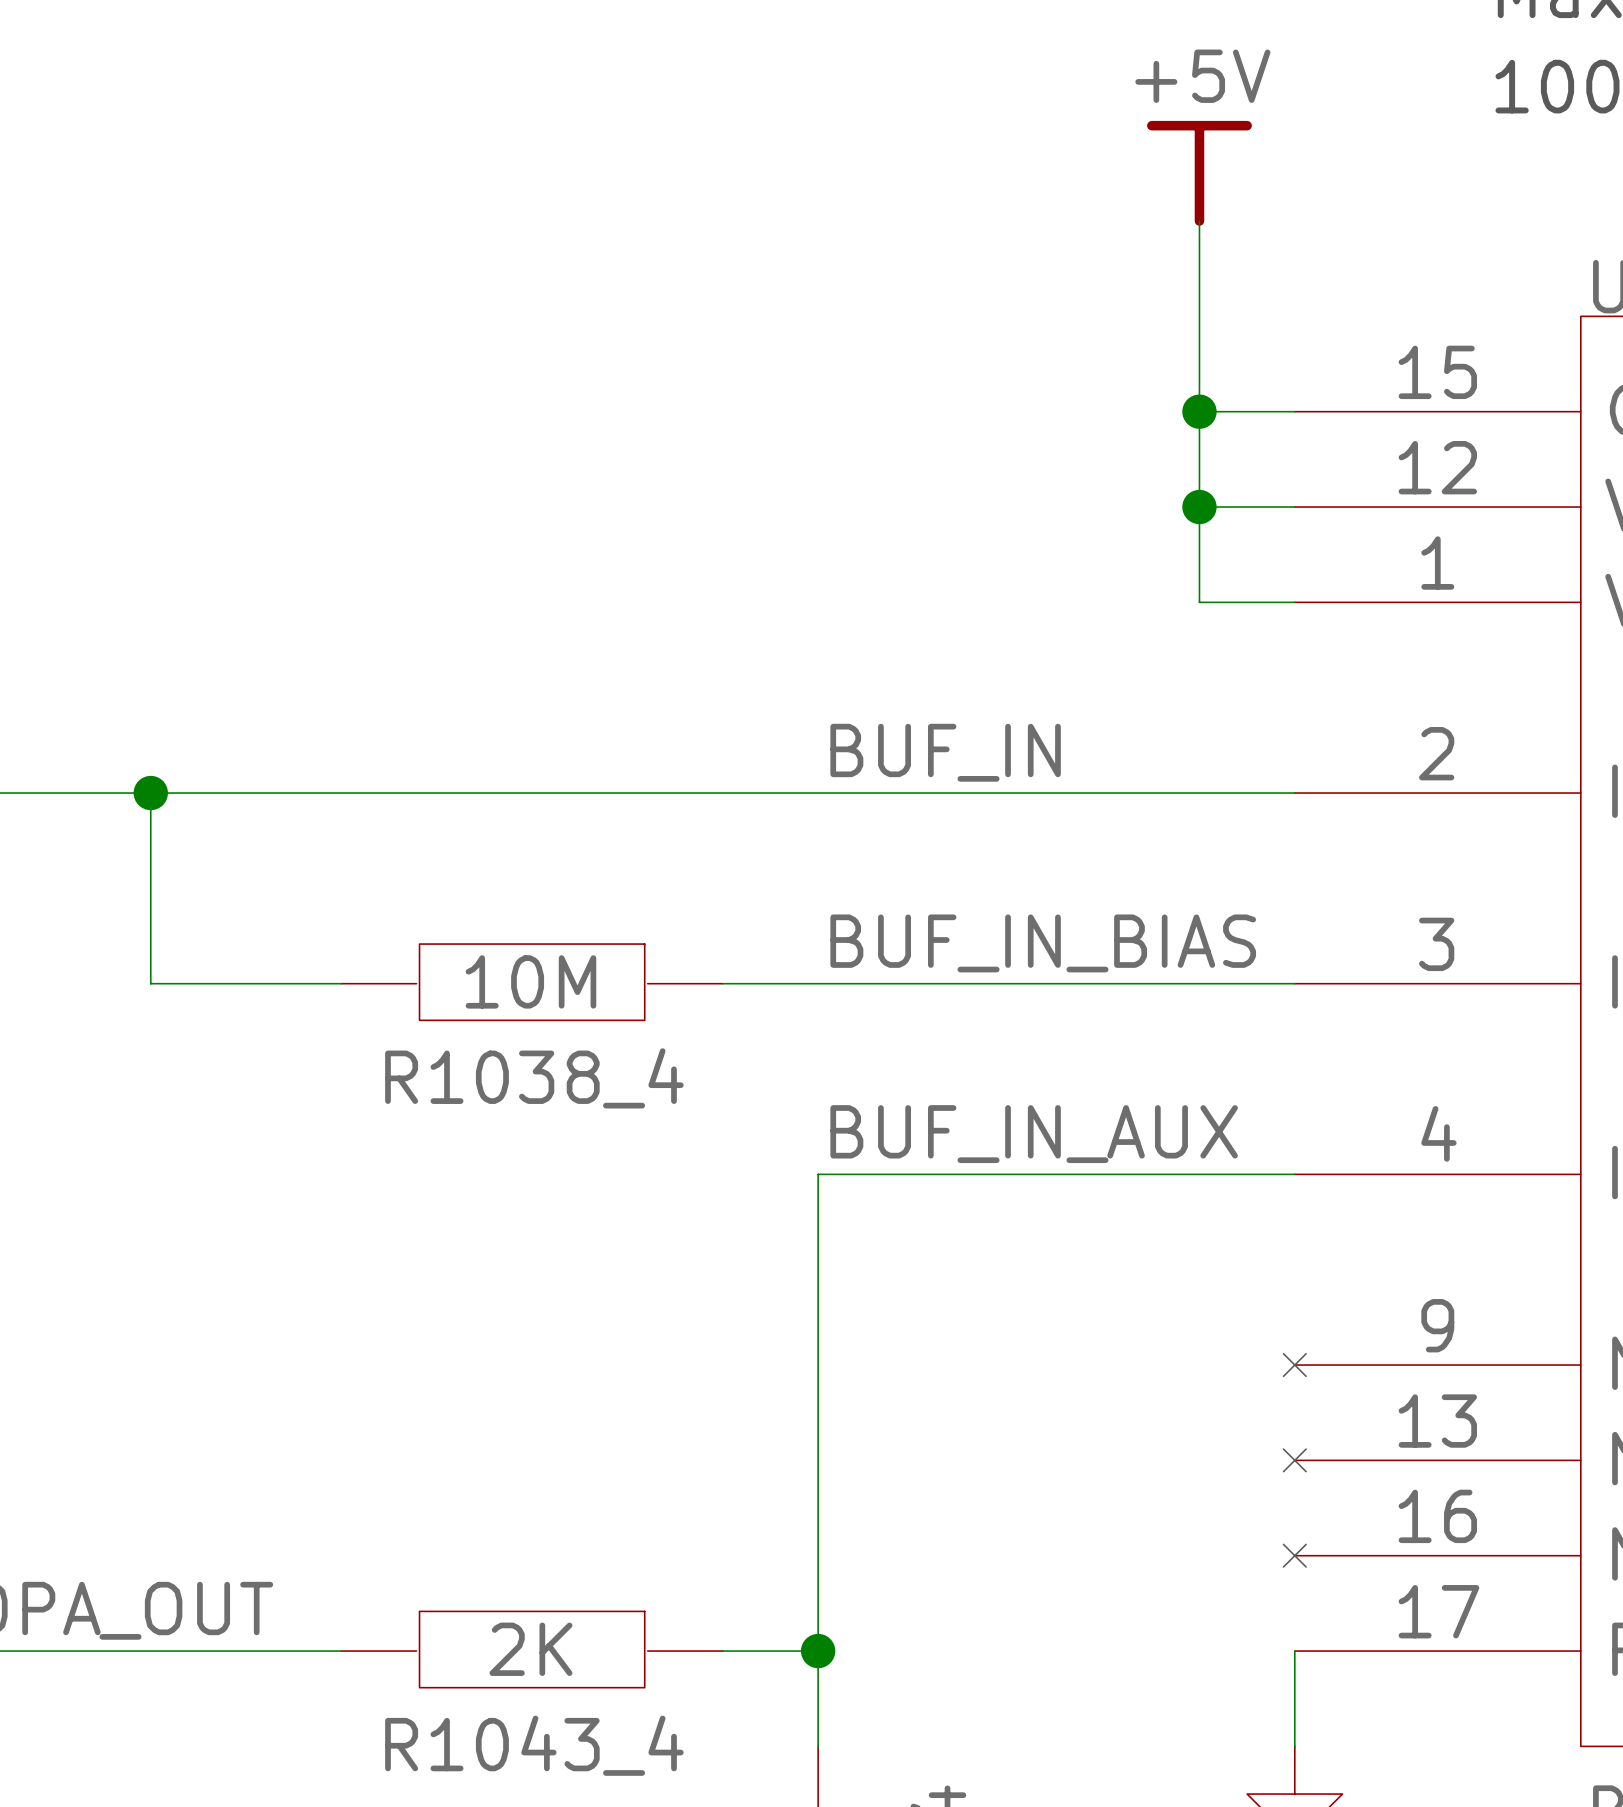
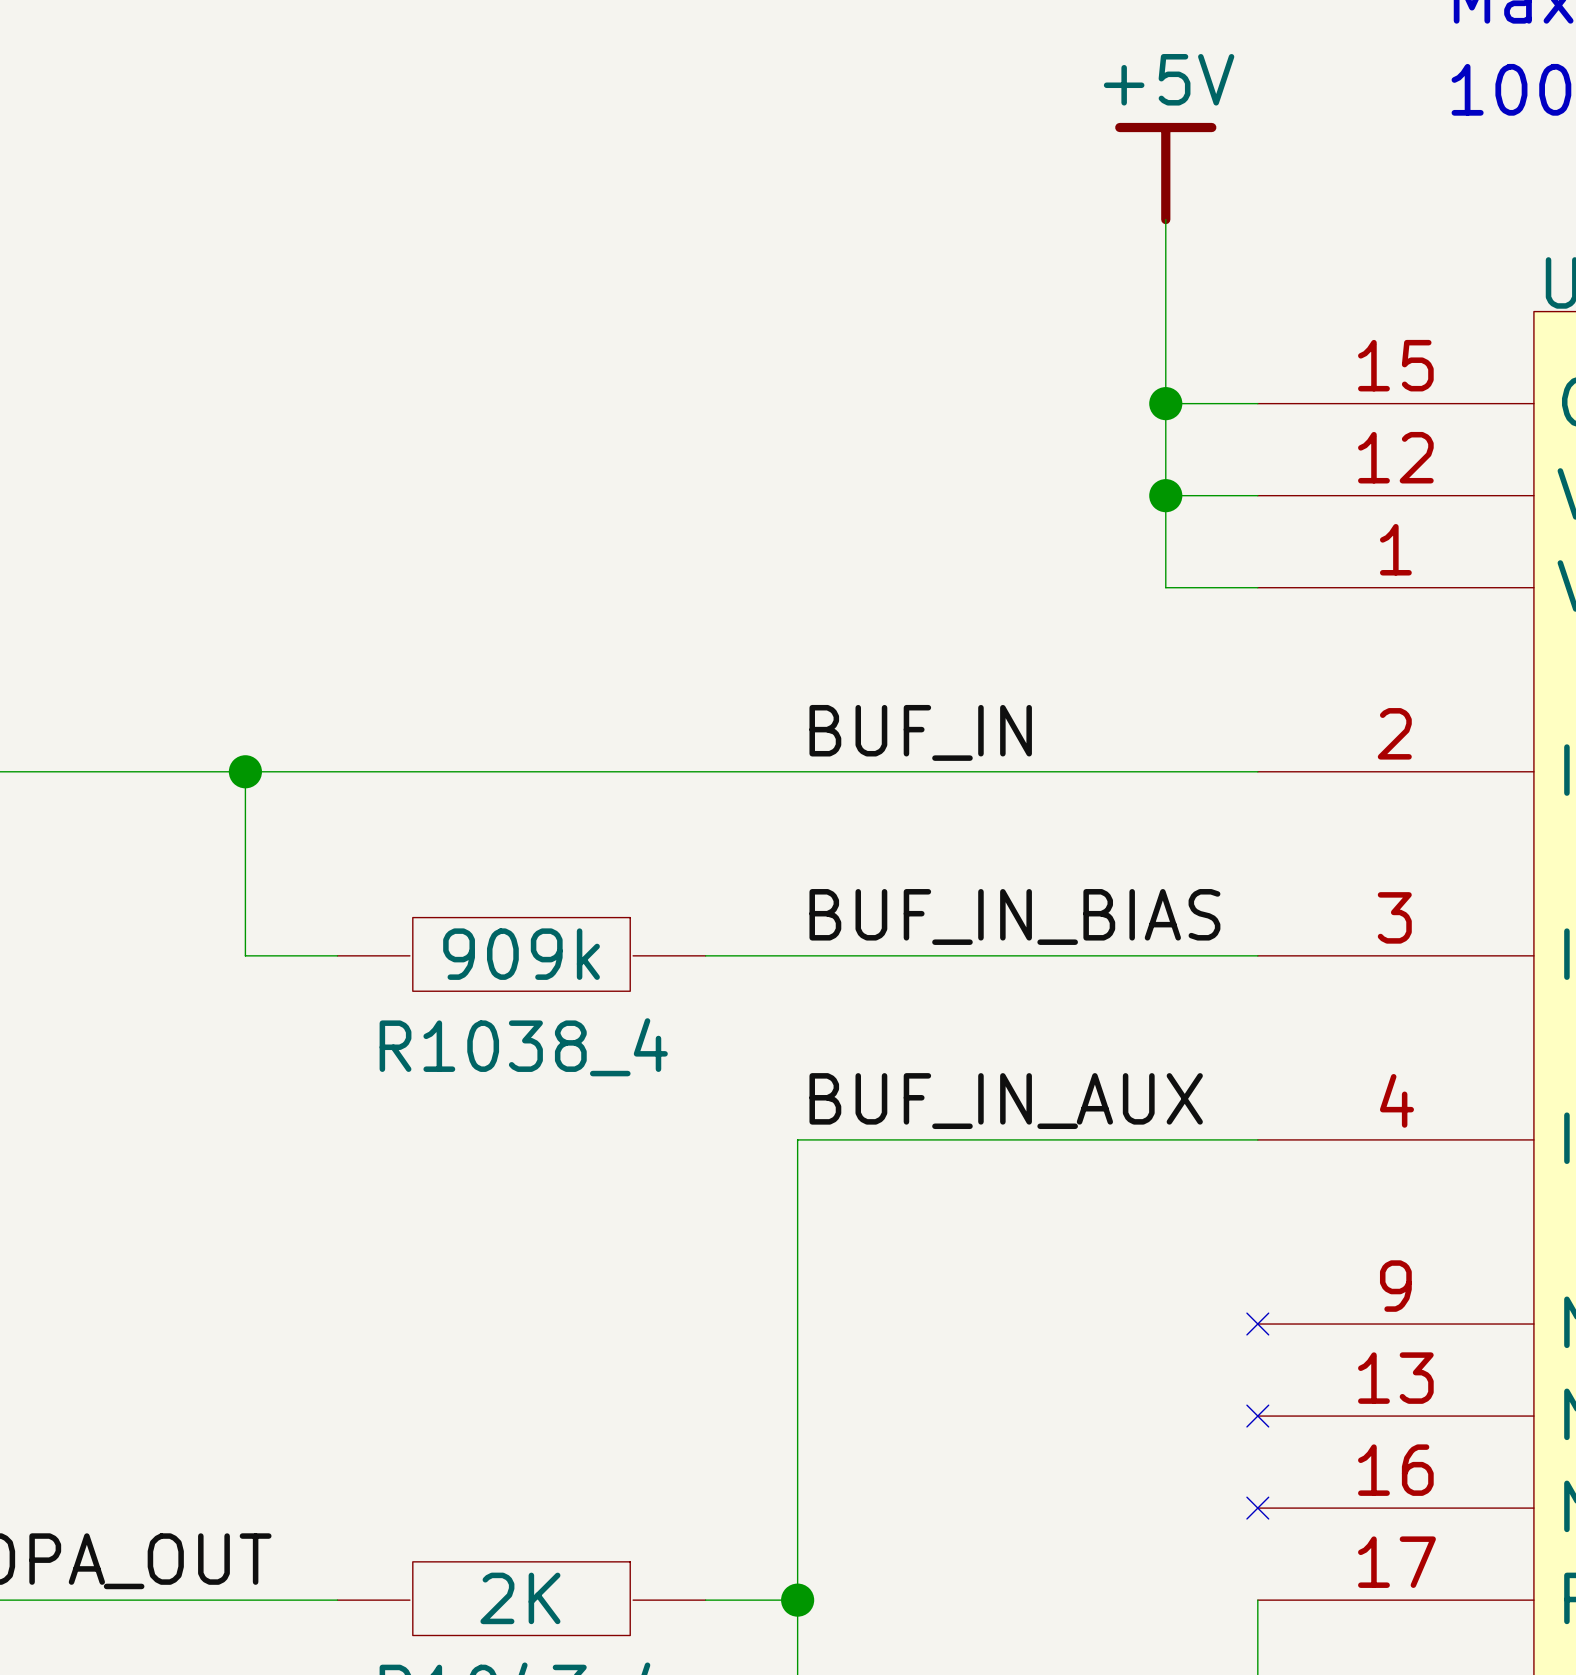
wire: (150, 793) (150, 983) (246, 983) -> (245, 771) (245, 955)
junction position: (150, 793) -> (245, 771)
R1038_4 value: 10M (530, 981) -> 909k (521, 954)

